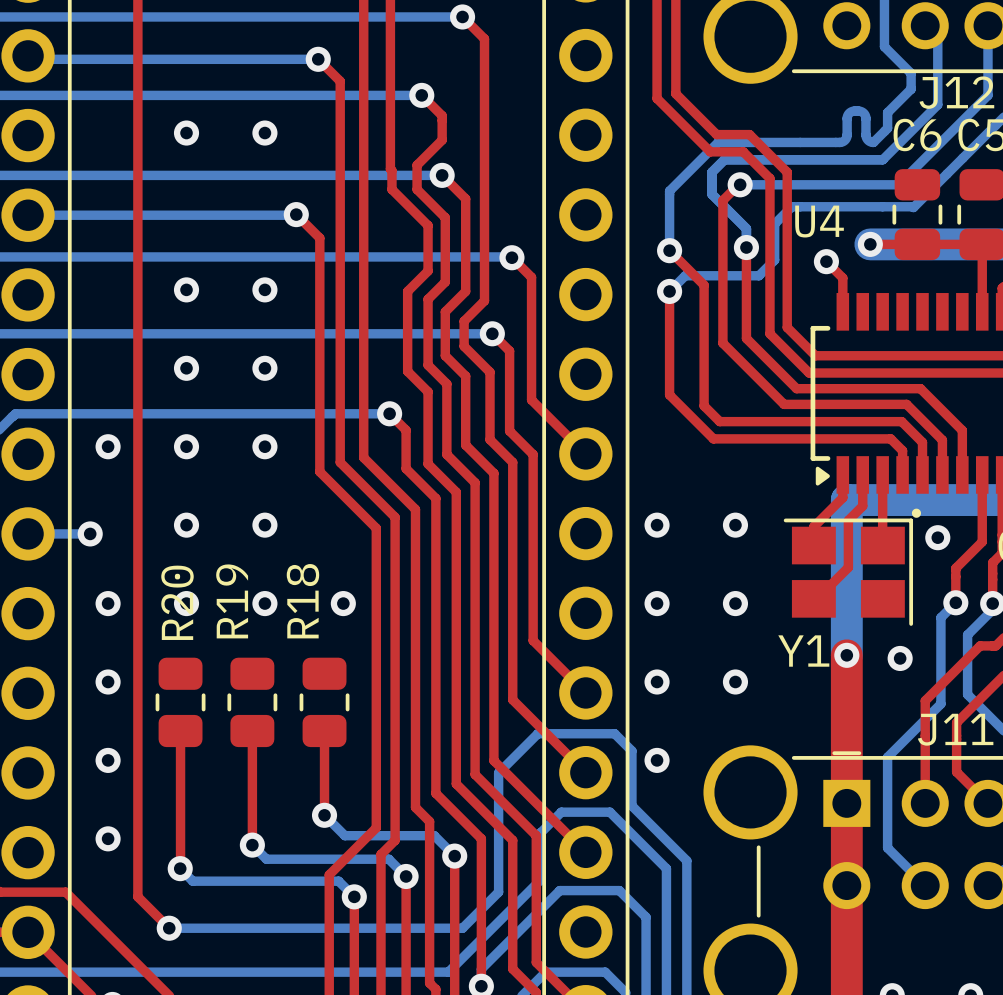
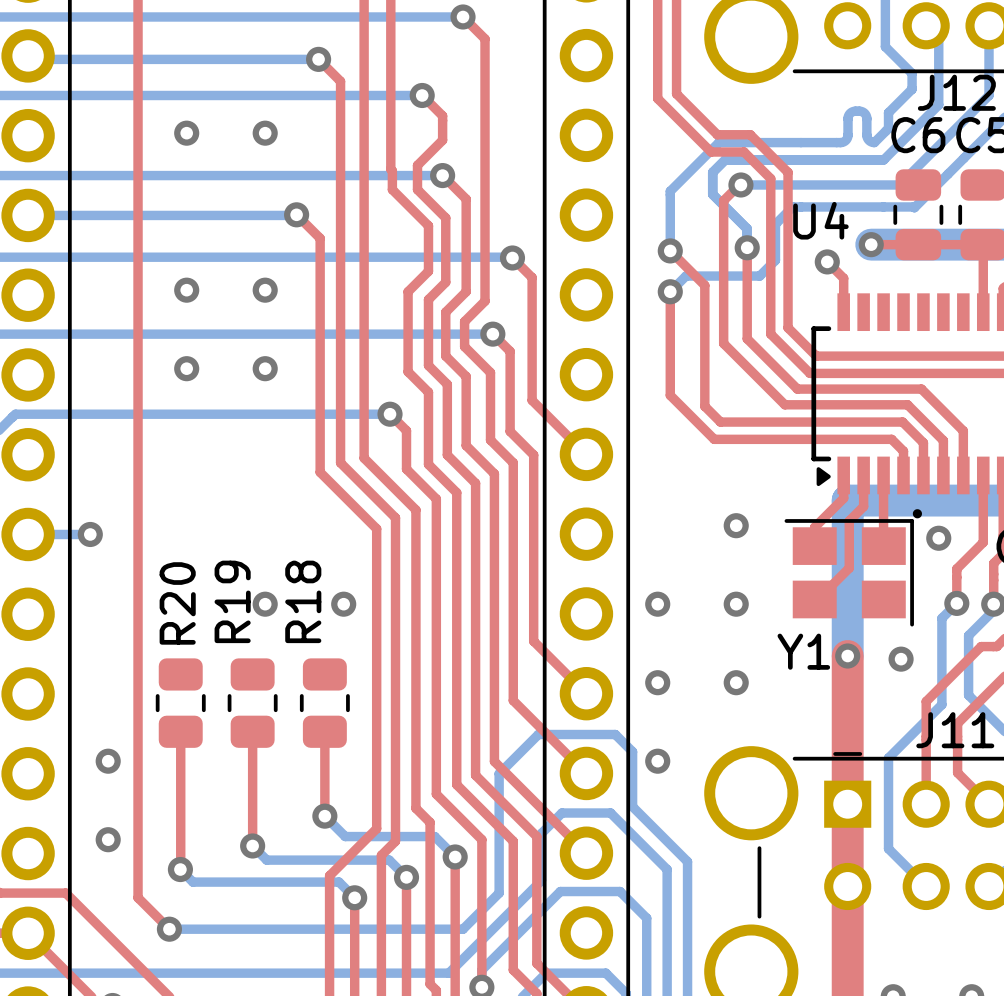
via: (108, 446) -> none
via: (186, 446) -> none
via: (264, 446) -> none
via: (186, 525) -> none
via: (264, 525) -> none
via: (657, 525) -> none
via: (108, 603) -> none
via: (186, 603) -> none
via: (108, 681) -> none

